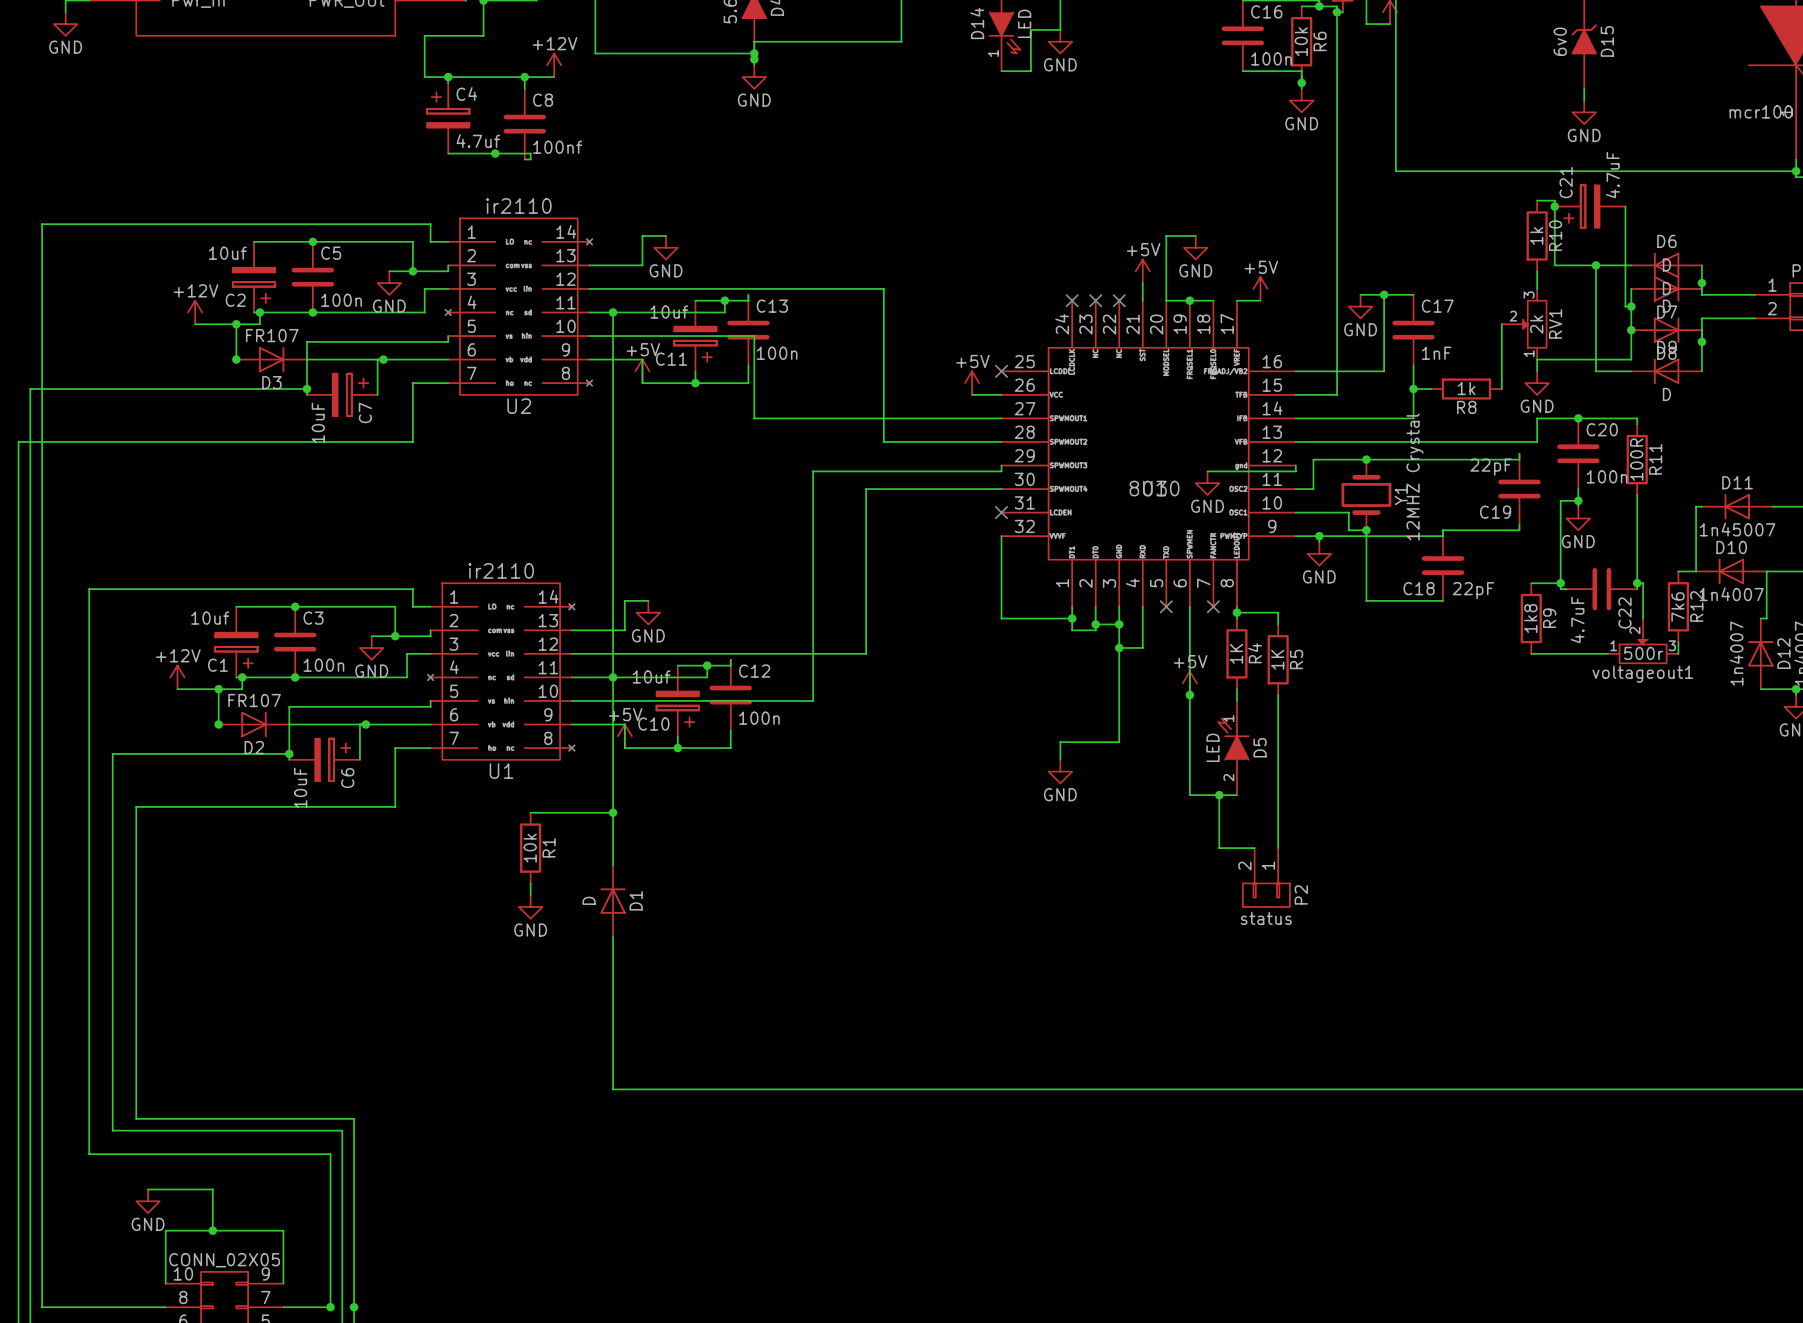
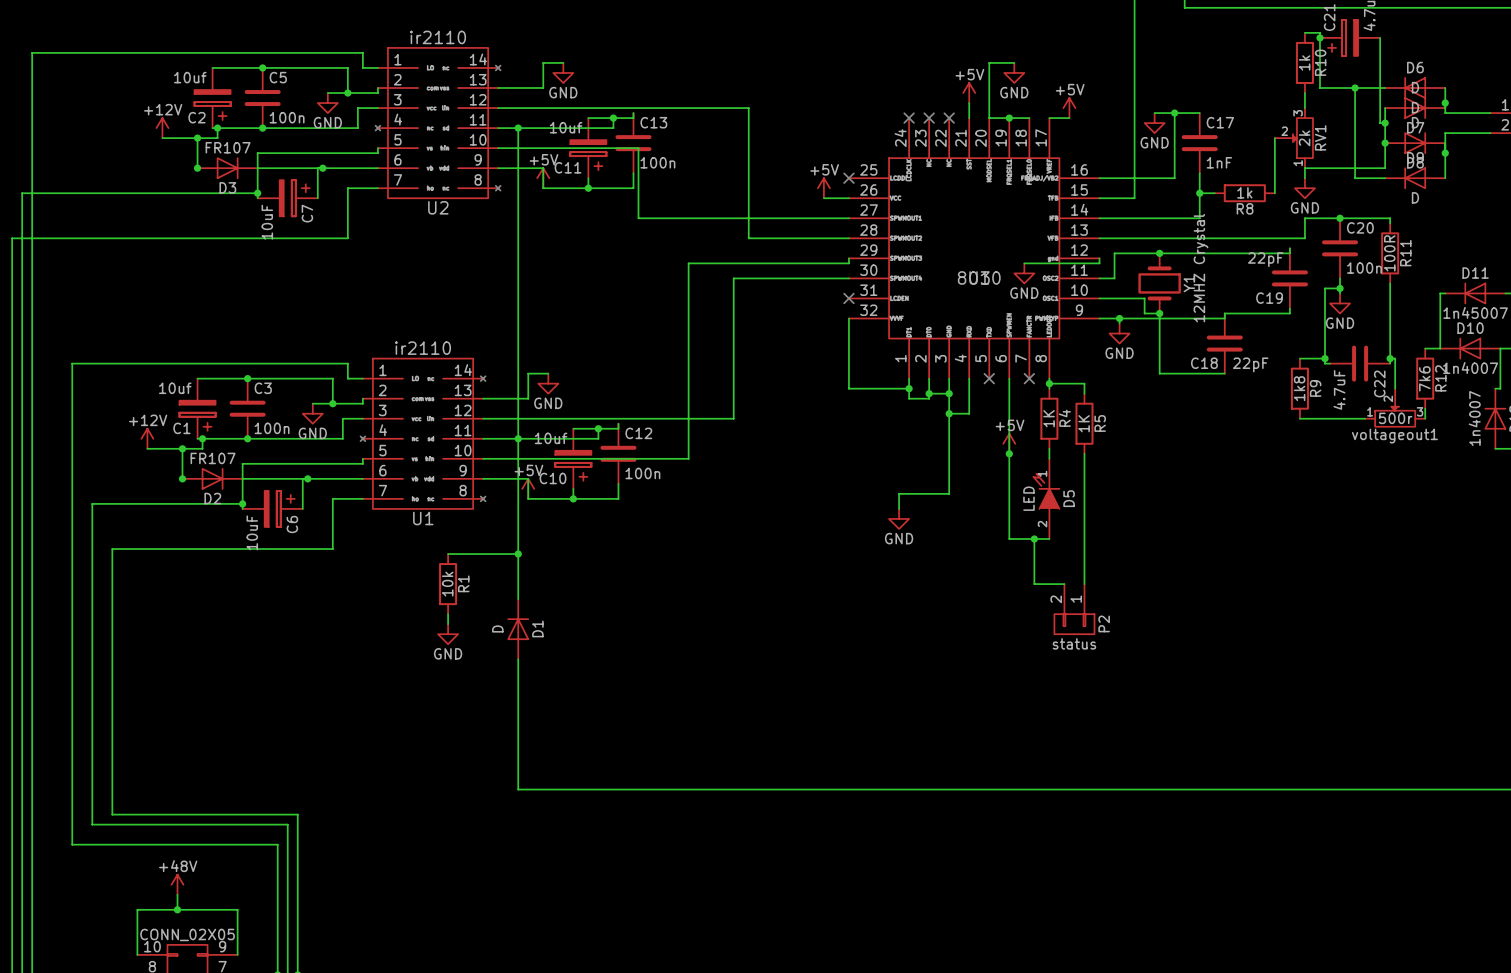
wire: (148, 1189) (212, 1189) (212, 1213) -> none
power symbol: GND (148, 1201) -> none
power symbol: none -> +48V (177, 884)

